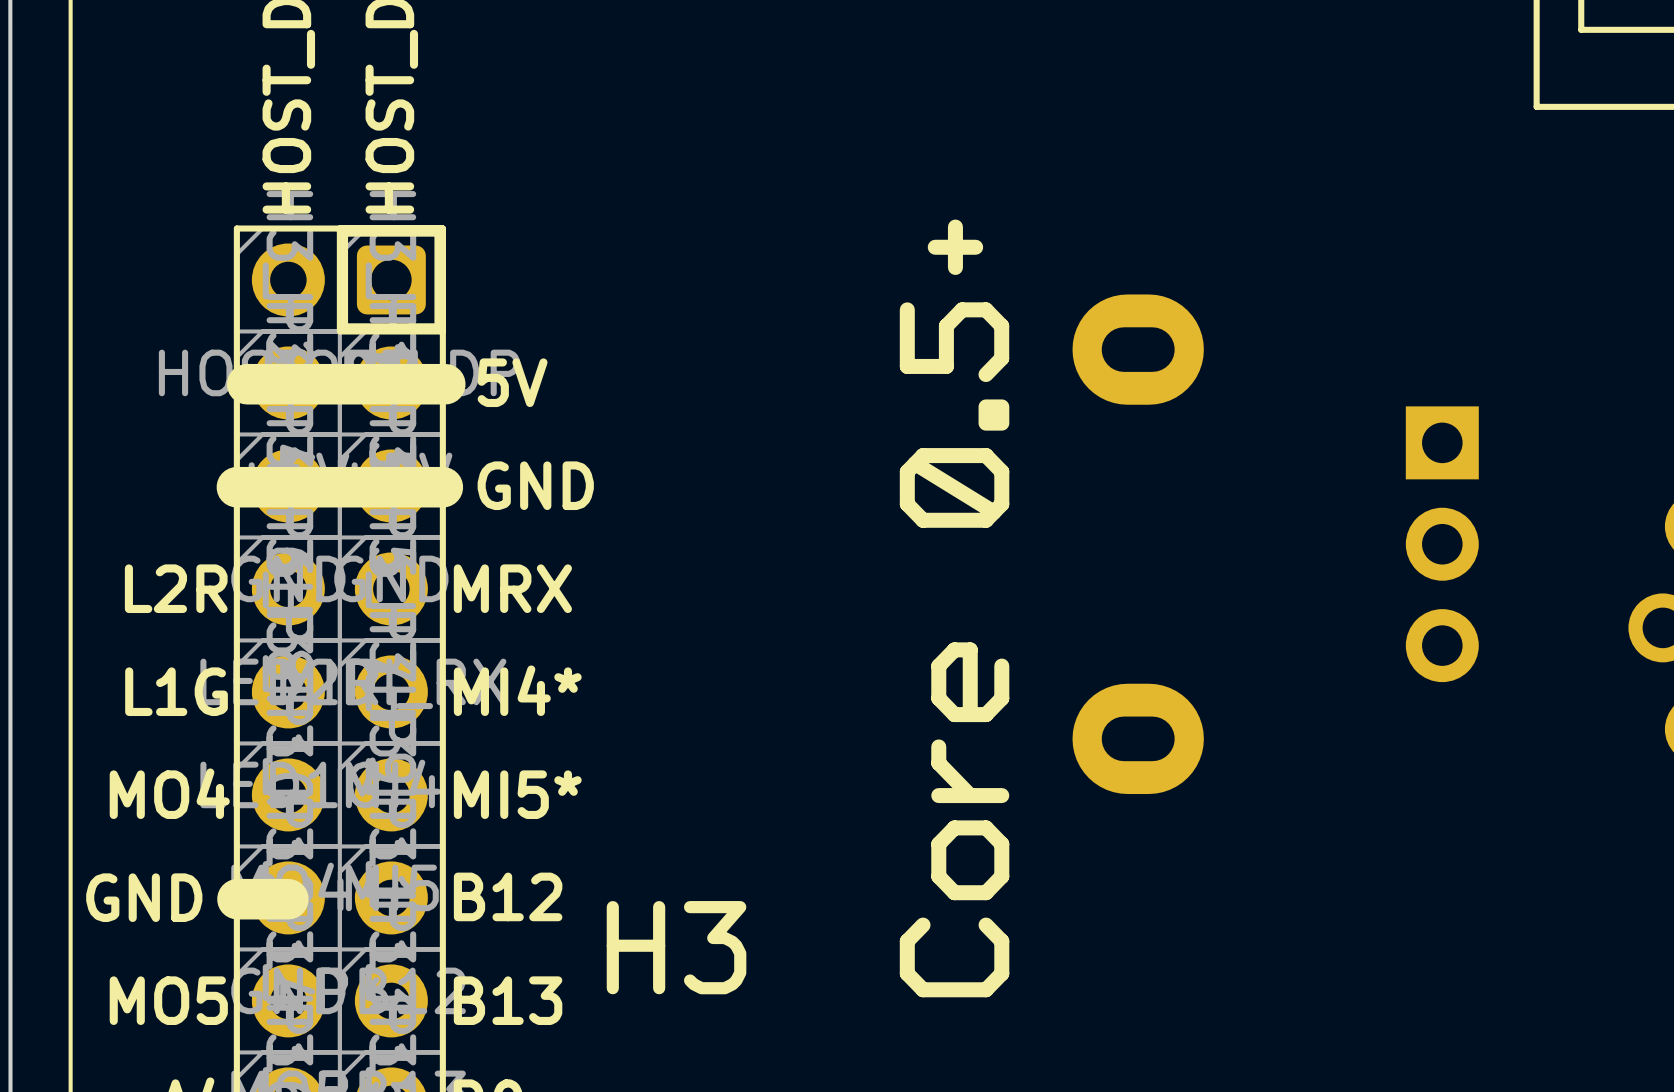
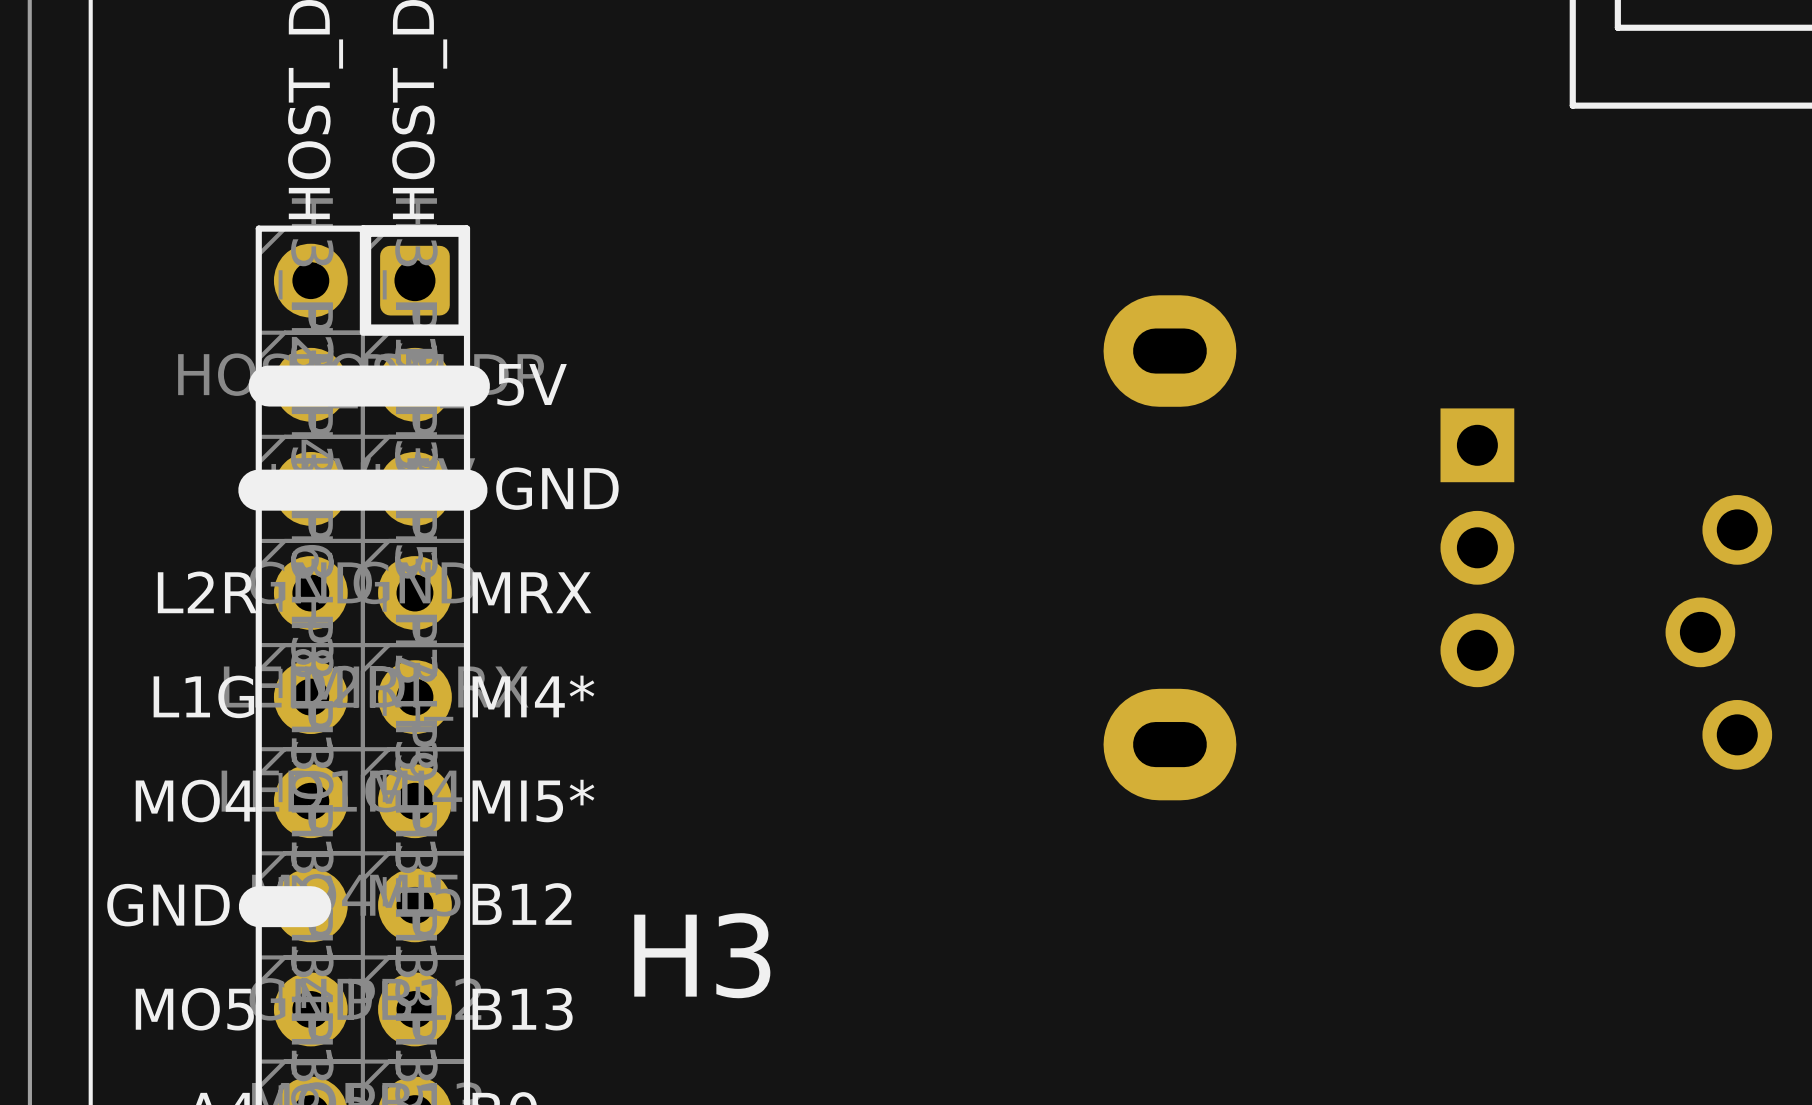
line: (955, 227) (955, 267) -> none
line: (975, 247) (935, 247) -> none
line: (907, 309) (907, 366) (946, 366) (946, 326) (962, 309) (985, 309) (1001, 326) (1001, 358) (985, 374) -> none
drawing: [978, 399, 1010, 431] -> none
line: (986, 455) (1001, 471) (1001, 504) (986, 520) (923, 520) (907, 504) (907, 471) (923, 455) (986, 455) -> none
line: (915, 463) (993, 512) -> none
line: (1001, 666) (1001, 698) (986, 714) (954, 714) (938, 698) (938, 666) (954, 649) (970, 649) (970, 714) -> none
line: (938, 746) (938, 763) (970, 795) -> none
line: (1001, 795) (938, 795) -> none
line: (986, 827) (1001, 844) (1001, 876) (986, 892) (954, 892) (938, 876) (938, 844) (954, 827) (986, 827) -> none
line: (986, 925) (1001, 941) (1001, 973) (986, 989) (923, 989) (907, 973) (907, 941) (923, 925) -> none

